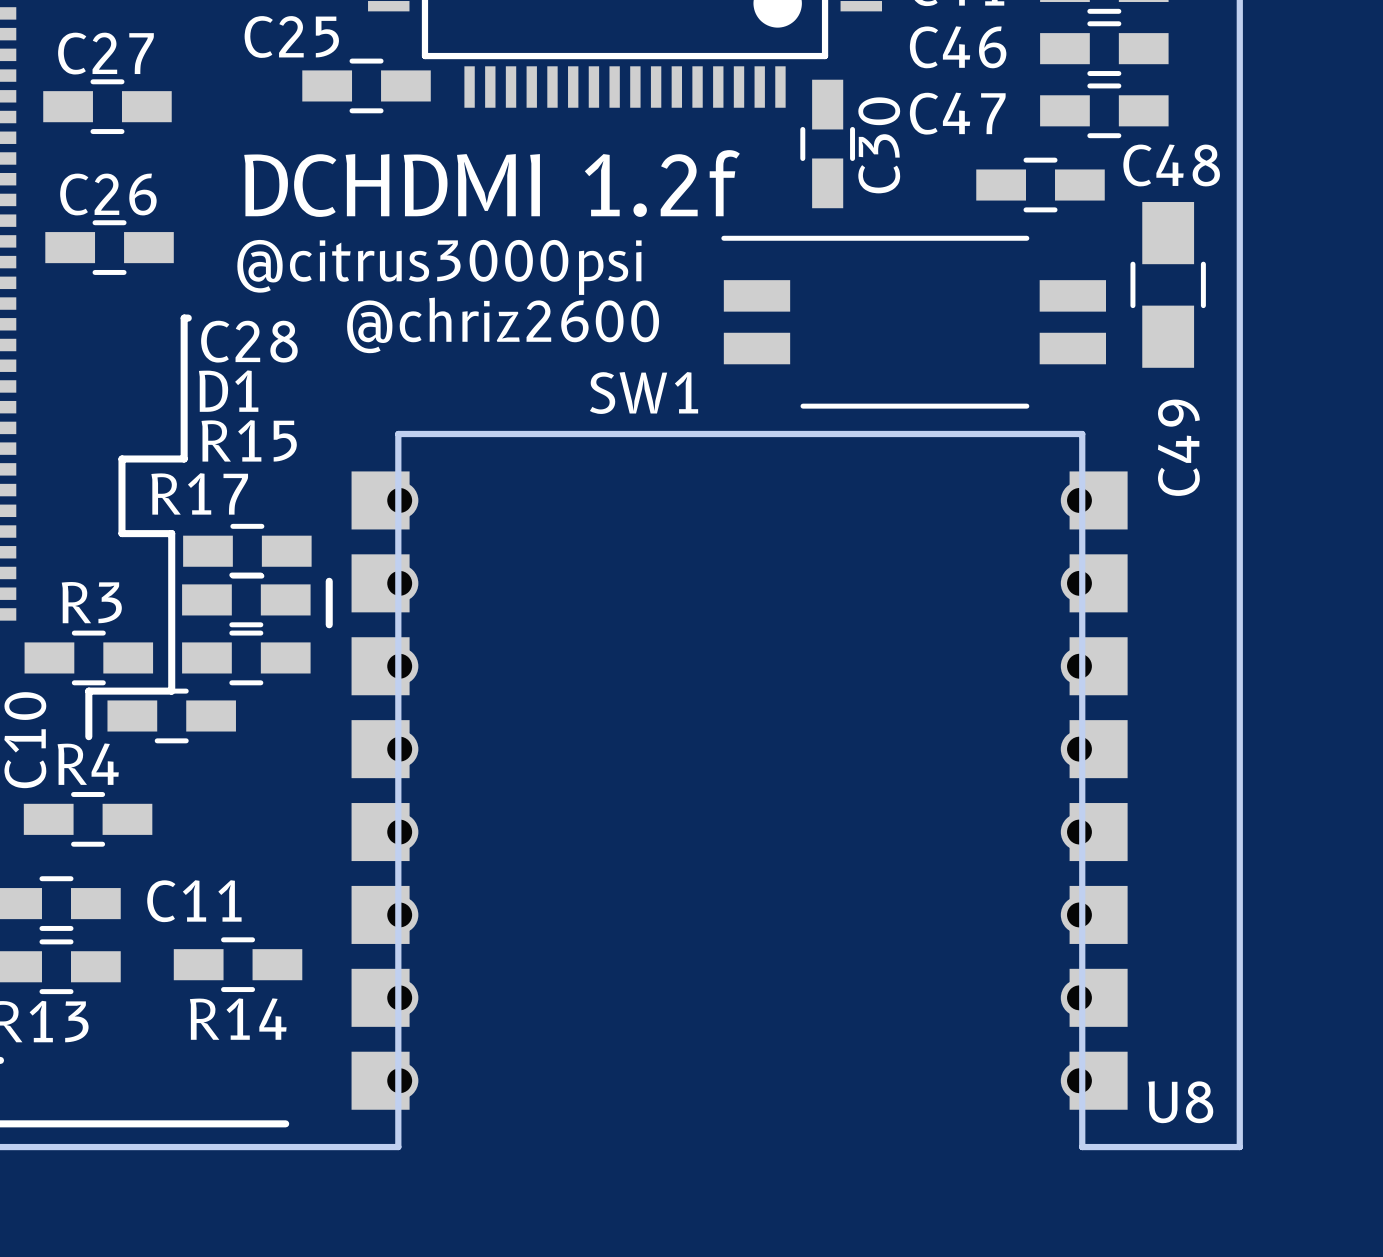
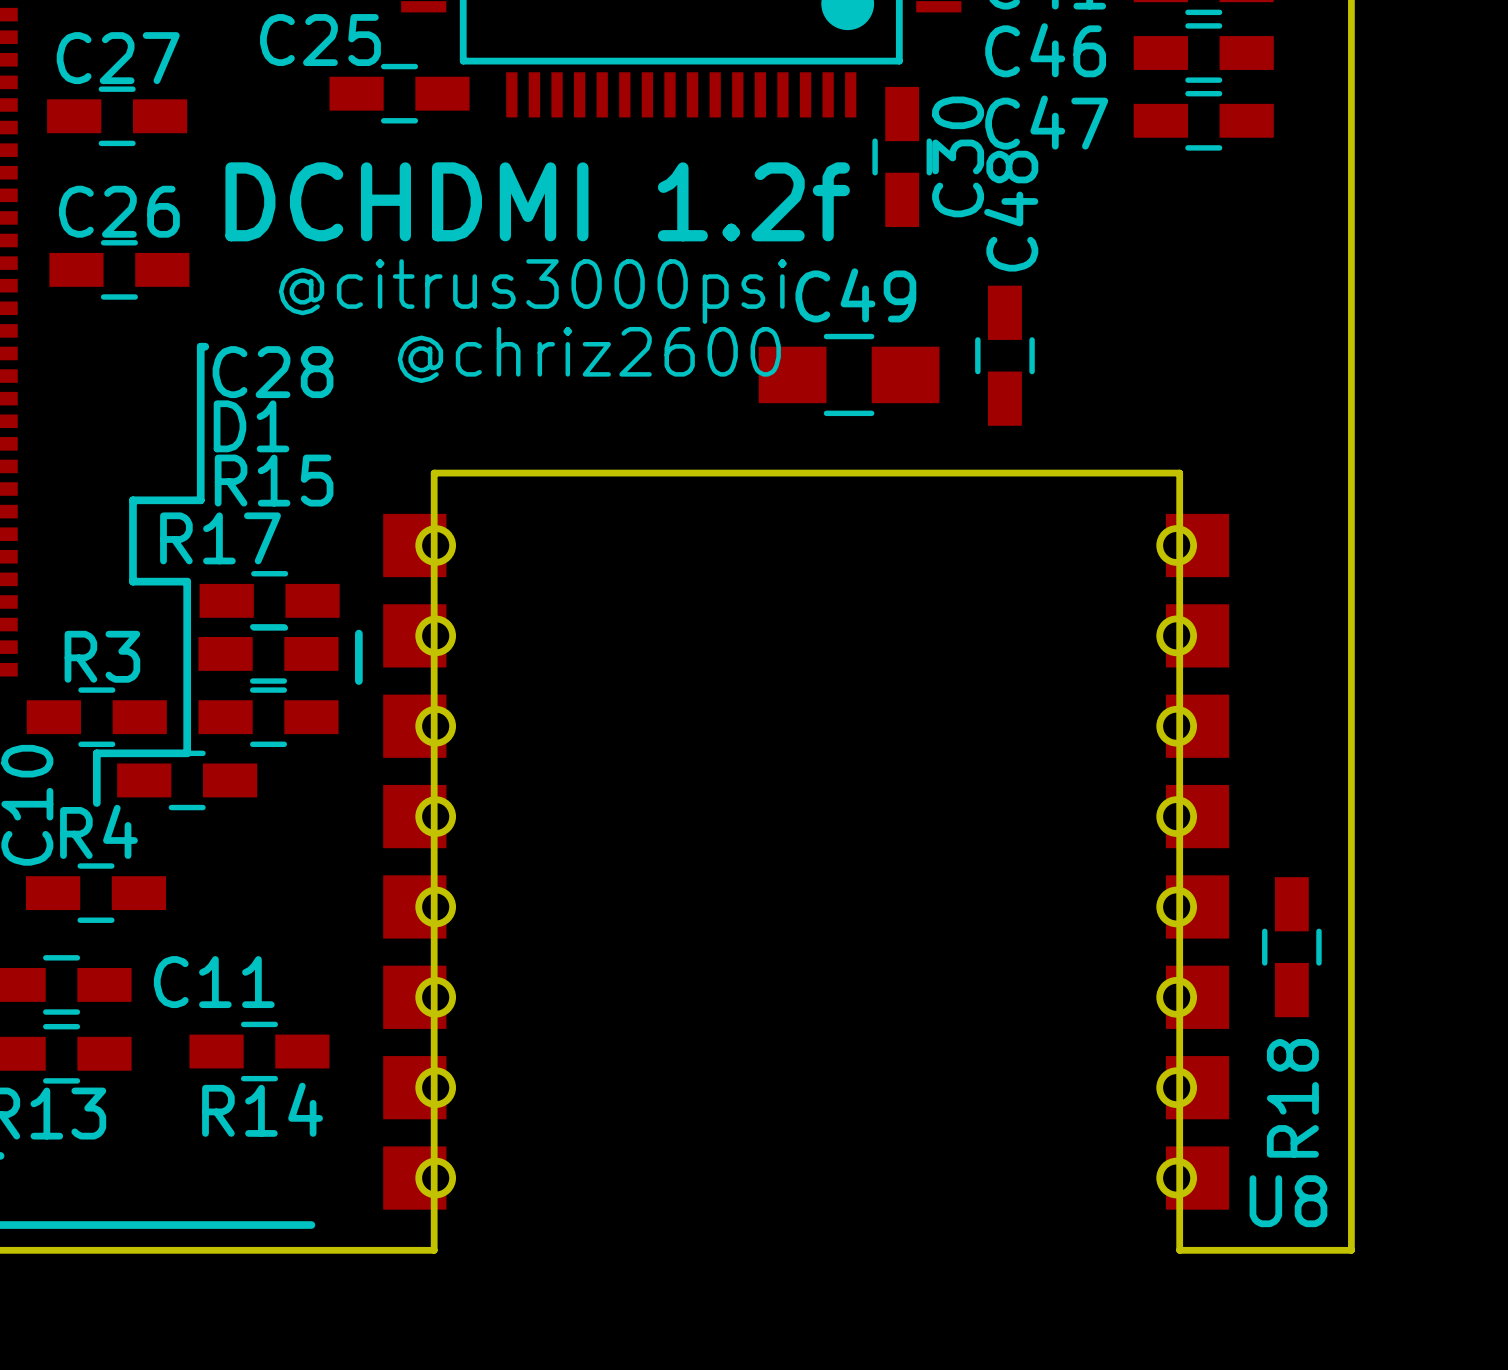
C48 name position: C48 (1171, 165) -> C48 (1011, 211)
C48 rotation: 0° (1040, 185) -> 90° clockwise (1004, 355)
C48 position: (1040, 185) -> (1004, 355)
text position: @citrus3000psi (439, 267) -> @citrus3000psi (532, 291)
C49 rotation: 0° (1168, 284) -> 90° clockwise (849, 374)
C49 position: (1168, 284) -> (849, 374)
SW1: (913, 322) -> none
text position: @chriz2600 (503, 325) -> @chriz2600 (589, 355)
C49 name position: C49 (1178, 447) -> C49 (855, 295)
R18: none -> (1291, 947)

